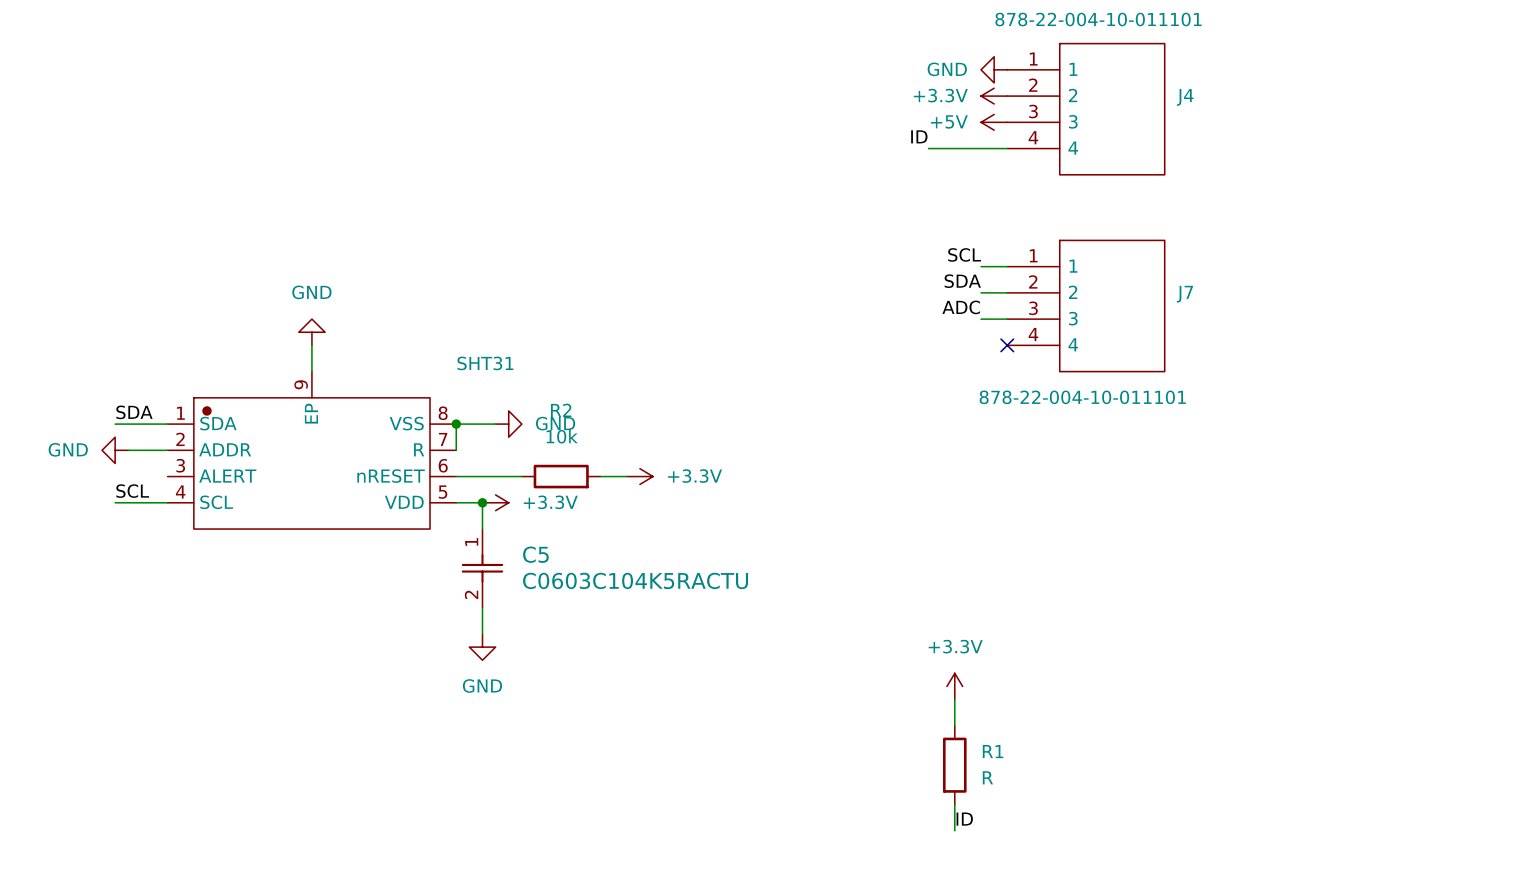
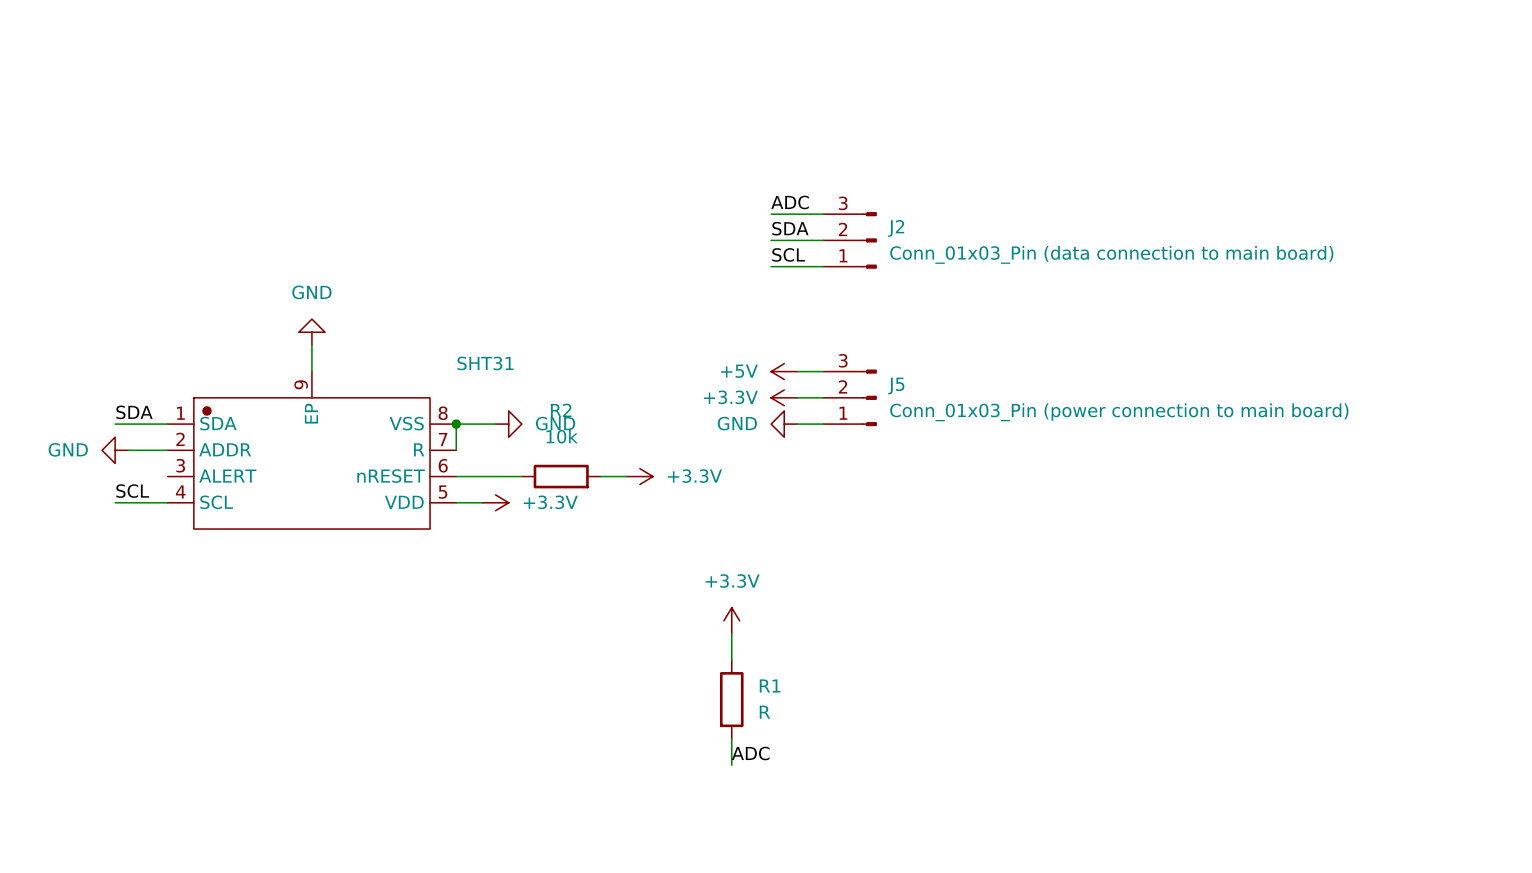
power symbol: GND (994, 69) -> none
power symbol: +3.3V (994, 96) -> none
J4: 878-22-004-10-011101 (1086, 109) -> none
power symbol: +5V (994, 122) -> none
label: ID (919, 136) -> none
wire: (928, 148) (1007, 148) -> none
wire: none -> (771, 214) (823, 214)
wire: none -> (771, 240) (823, 240)
J2: none -> Conn_01x03_Pin (data connection to main board) (850, 240)
label position: SCL (964, 254) -> SCL (788, 254)
wire: none -> (771, 266) (823, 266)
wire: (981, 266) (1007, 266) -> (797, 371) (823, 371)
label position: SDA (962, 281) -> SDA (790, 228)
wire: (981, 292) (1007, 292) -> (797, 397) (823, 397)
J7: 878-22-004-10-011101 (1086, 306) -> none
label position: ADC (961, 307) -> ADC (790, 202)
wire: (981, 319) (1007, 319) -> (797, 424) (823, 424)
no-connect mark: (1007, 345) -> none
power symbol: none -> +5V (784, 371)
power symbol: none -> +3.3V (784, 397)
J5: none -> Conn_01x03_Pin (power connection to main board) (850, 397)
power symbol: none -> GND (784, 424)
wire: (482, 502) (482, 529) -> none
junction: (482, 502) -> none
C5: C0603C104K5RACTU (482, 568) -> none
wire: (482, 607) (482, 633) -> none
power symbol: none -> +3.3V (731, 620)
power symbol: GND (482, 647) -> none
power symbol: +3.3V (954, 686) -> none
wire: (954, 699) (954, 725) -> (731, 633) (731, 660)
label: none -> ADC (750, 753)
R1 position: (954, 765) -> (731, 699)
wire: (954, 804) (954, 830) -> (731, 738) (731, 765)
label: ID (964, 819) -> none

